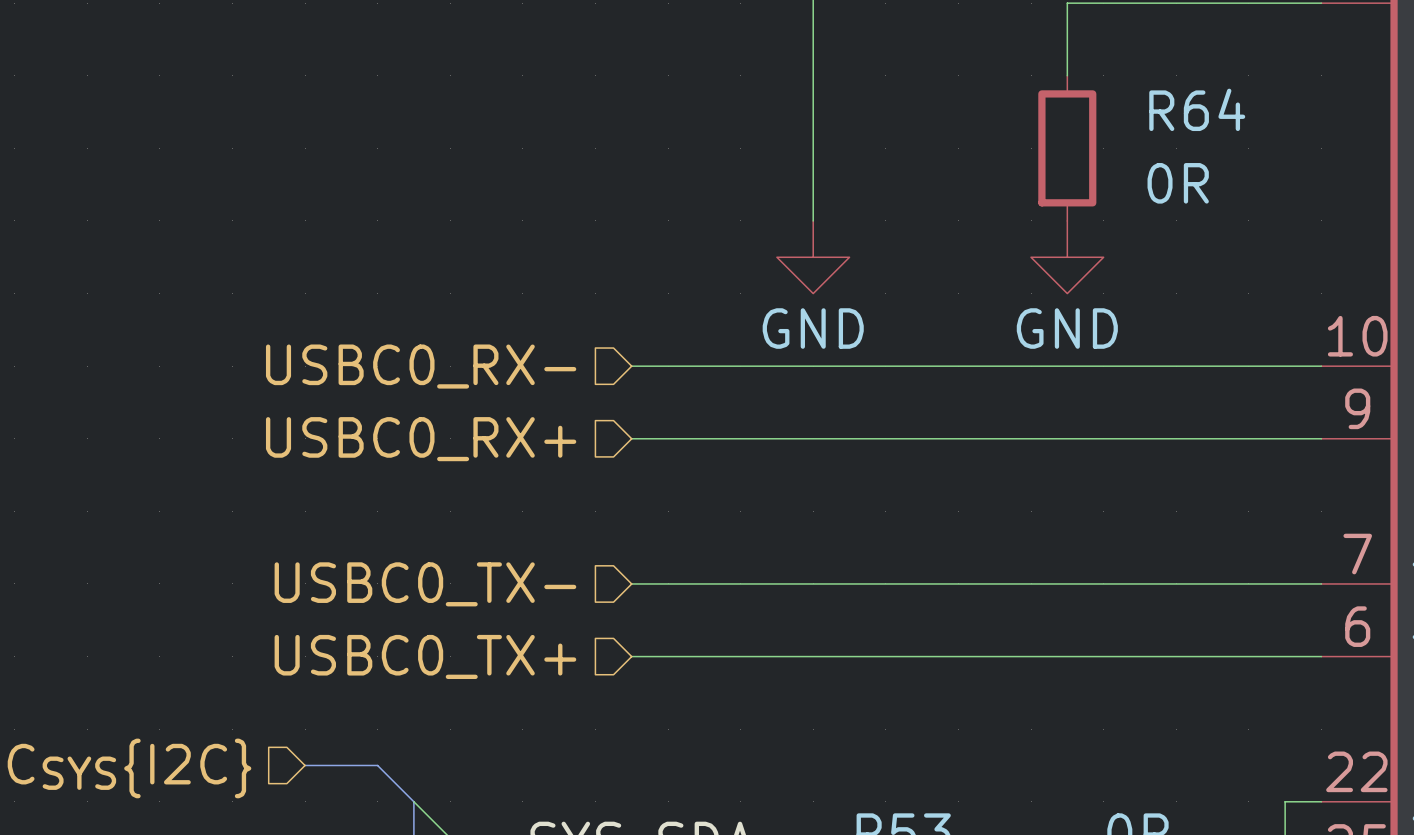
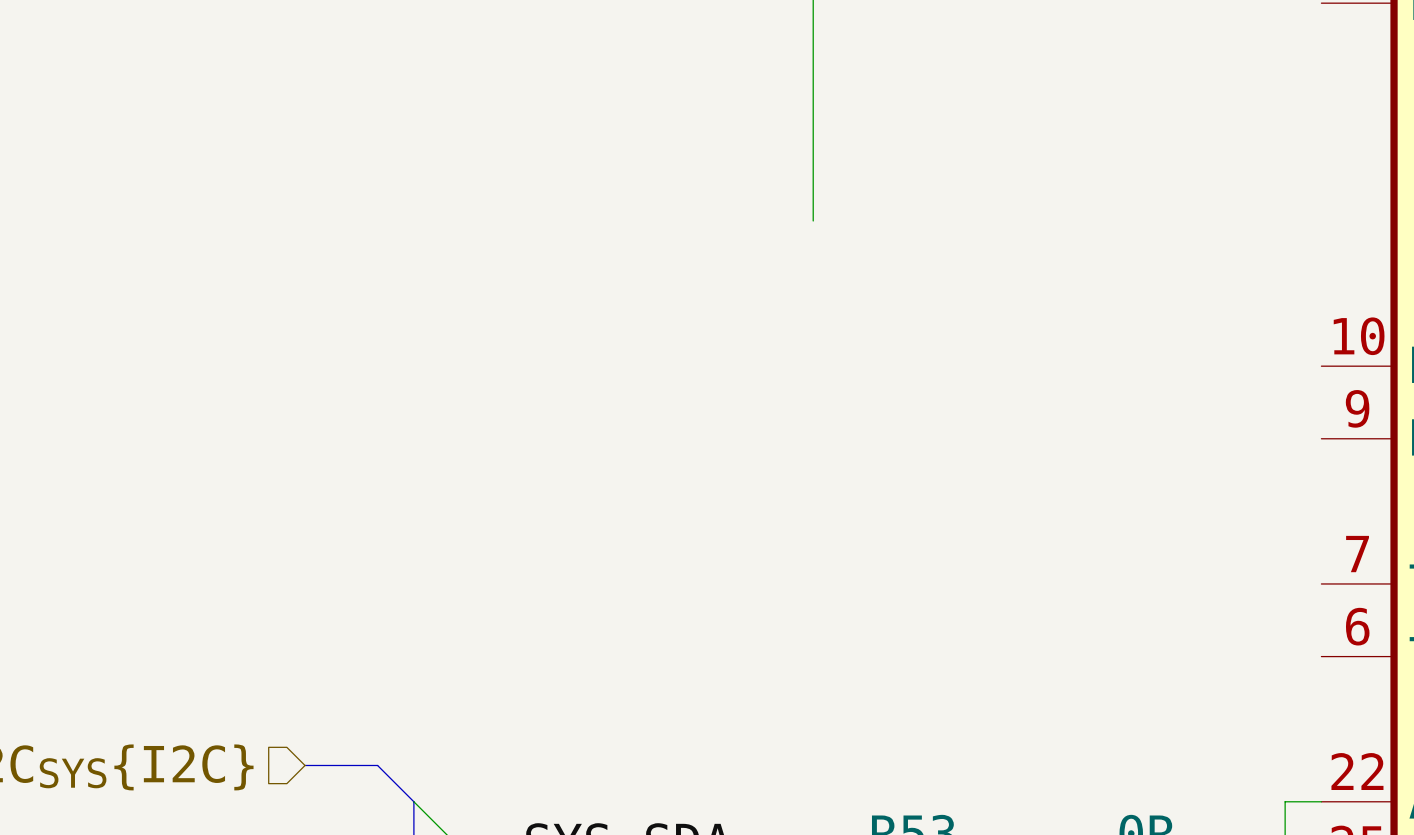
wire: (1321, 3) (1067, 3) (1067, 75) -> none
R64: (1067, 148) -> none
power symbol: GND (813, 257) -> none
power symbol: GND (1067, 257) -> none
hierarchical label: USBC0_RX- (421, 366) -> none
wire: (631, 366) (1321, 366) -> none
wire: (631, 438) (1321, 438) -> none
hierarchical label: USBC0_RX+ (421, 439) -> none
wire: (631, 583) (1321, 583) -> none
hierarchical label: USBC0_TX- (425, 584) -> none
hierarchical label: USBC0_TX+ (425, 656) -> none
wire: (631, 656) (1321, 656) -> none

